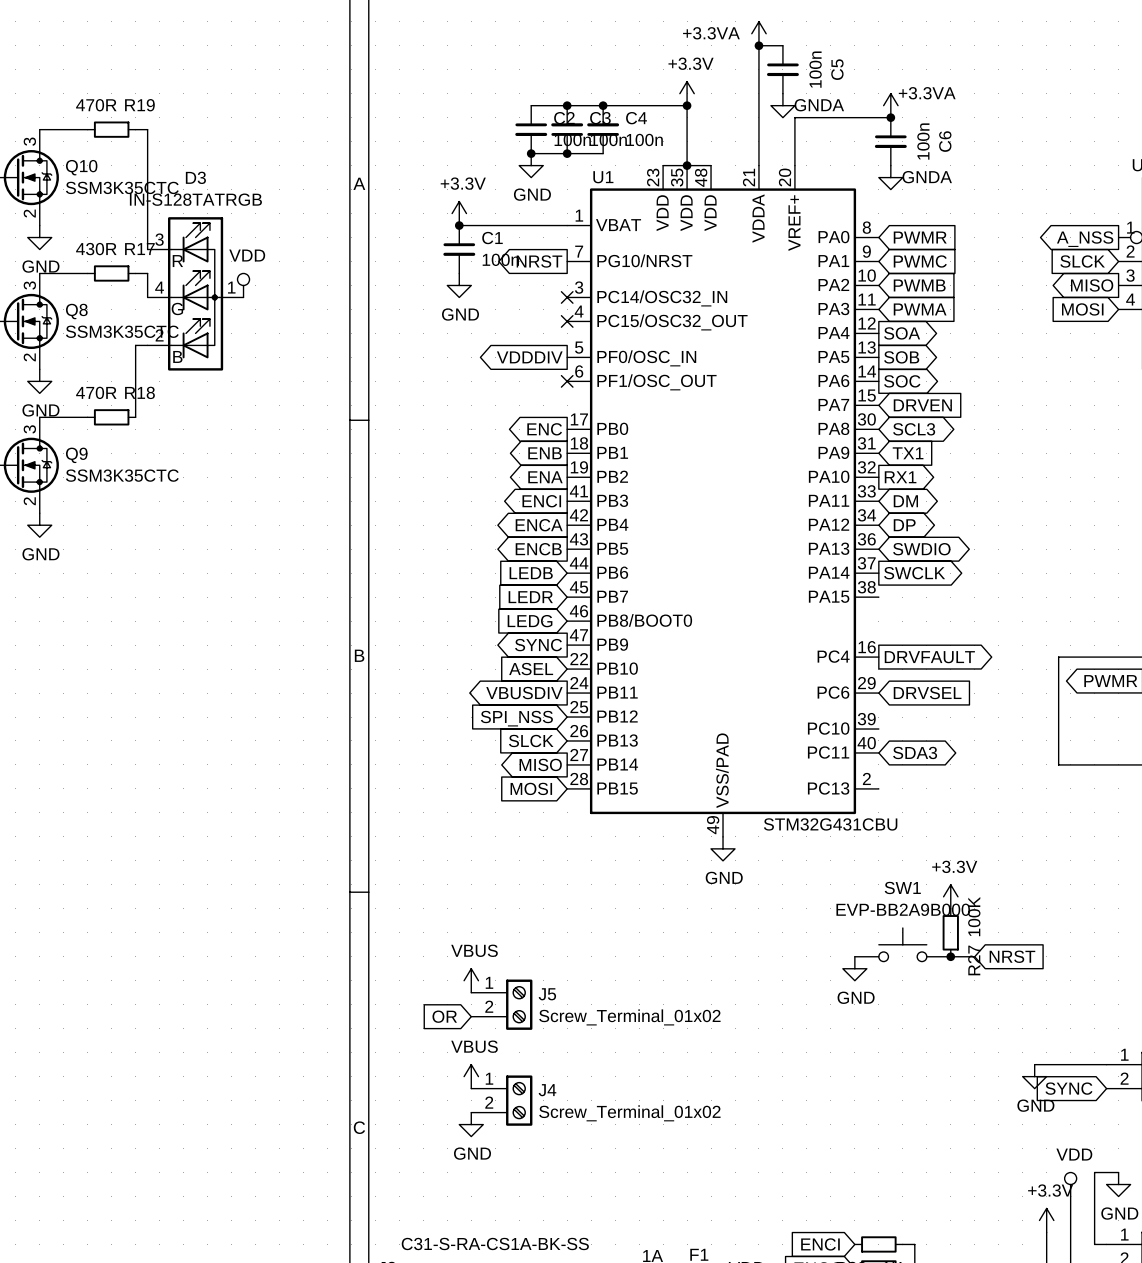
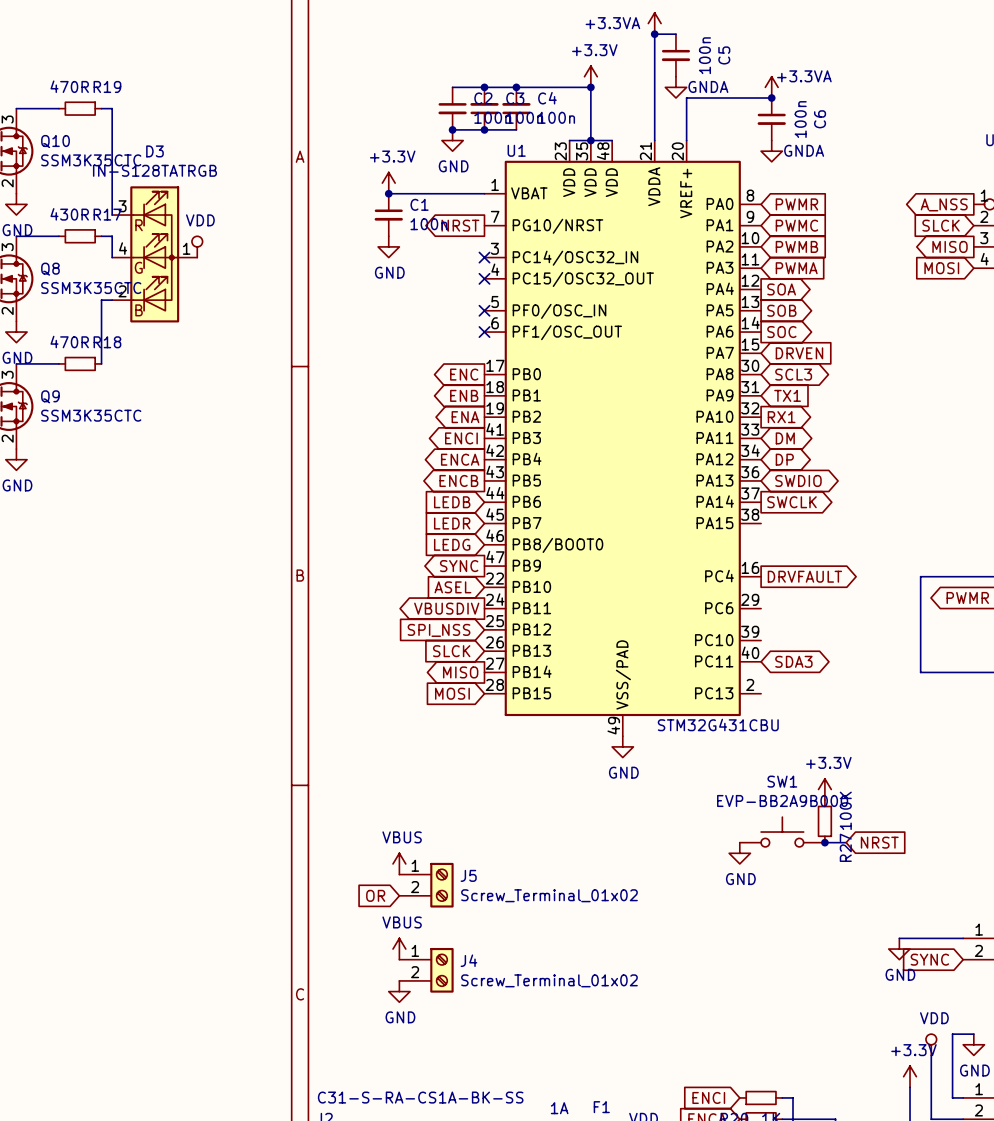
global label: VDDDIV (529, 357) -> none
no-connect mark: none -> (484, 310)
global label: DRVSEL (927, 693) -> none

